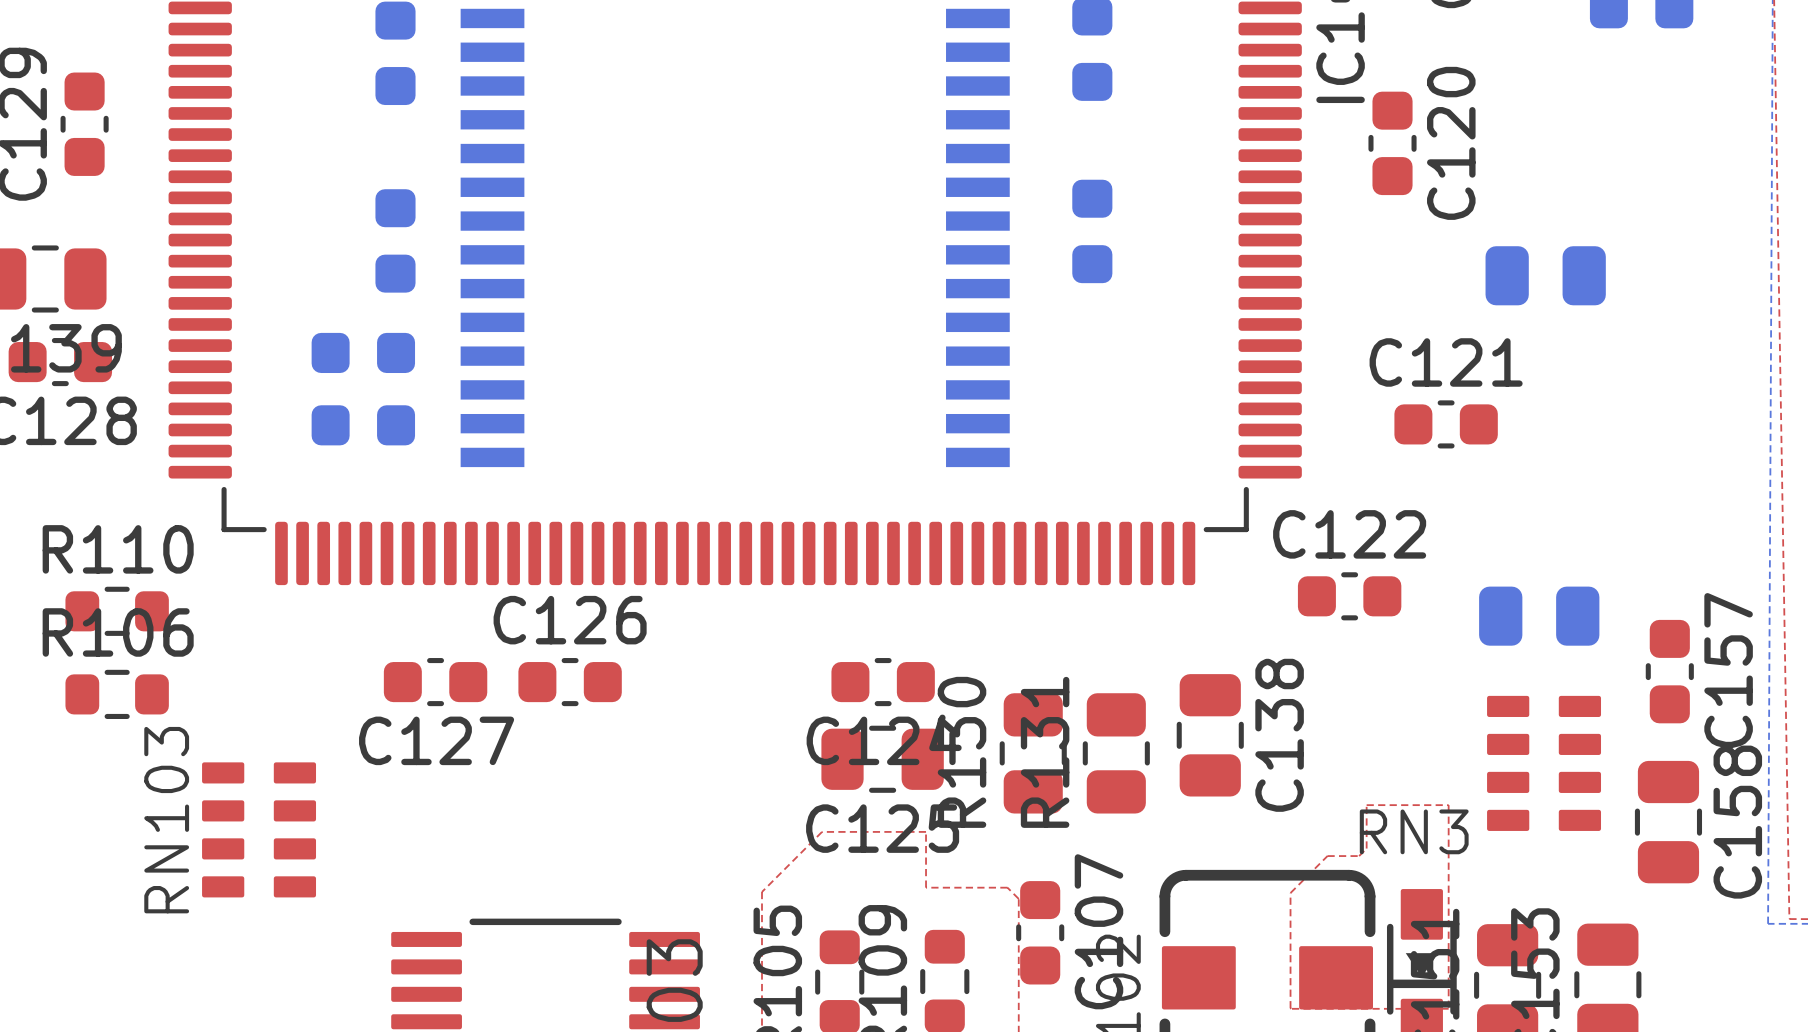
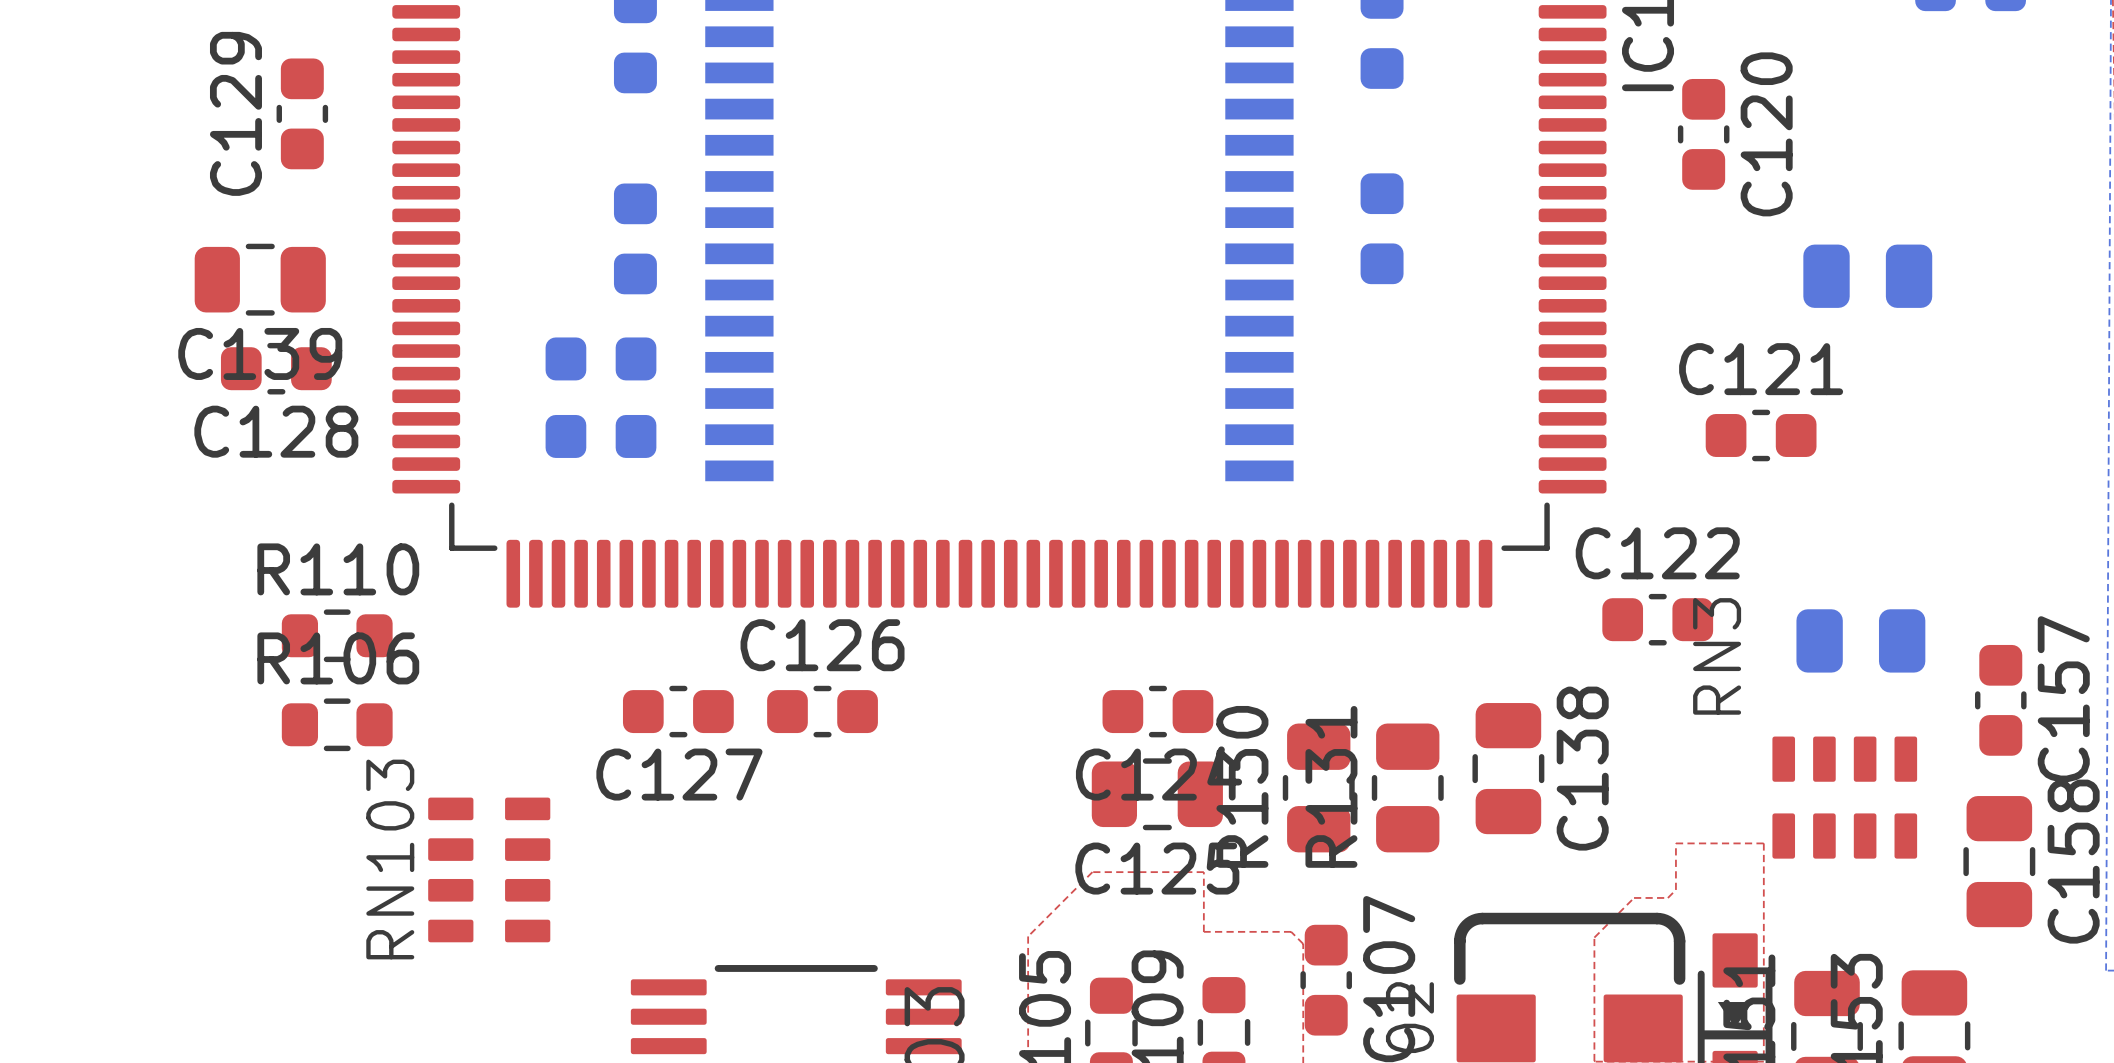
RN3 rotation: 0° (1544, 763) -> 90° clockwise (1844, 797)

